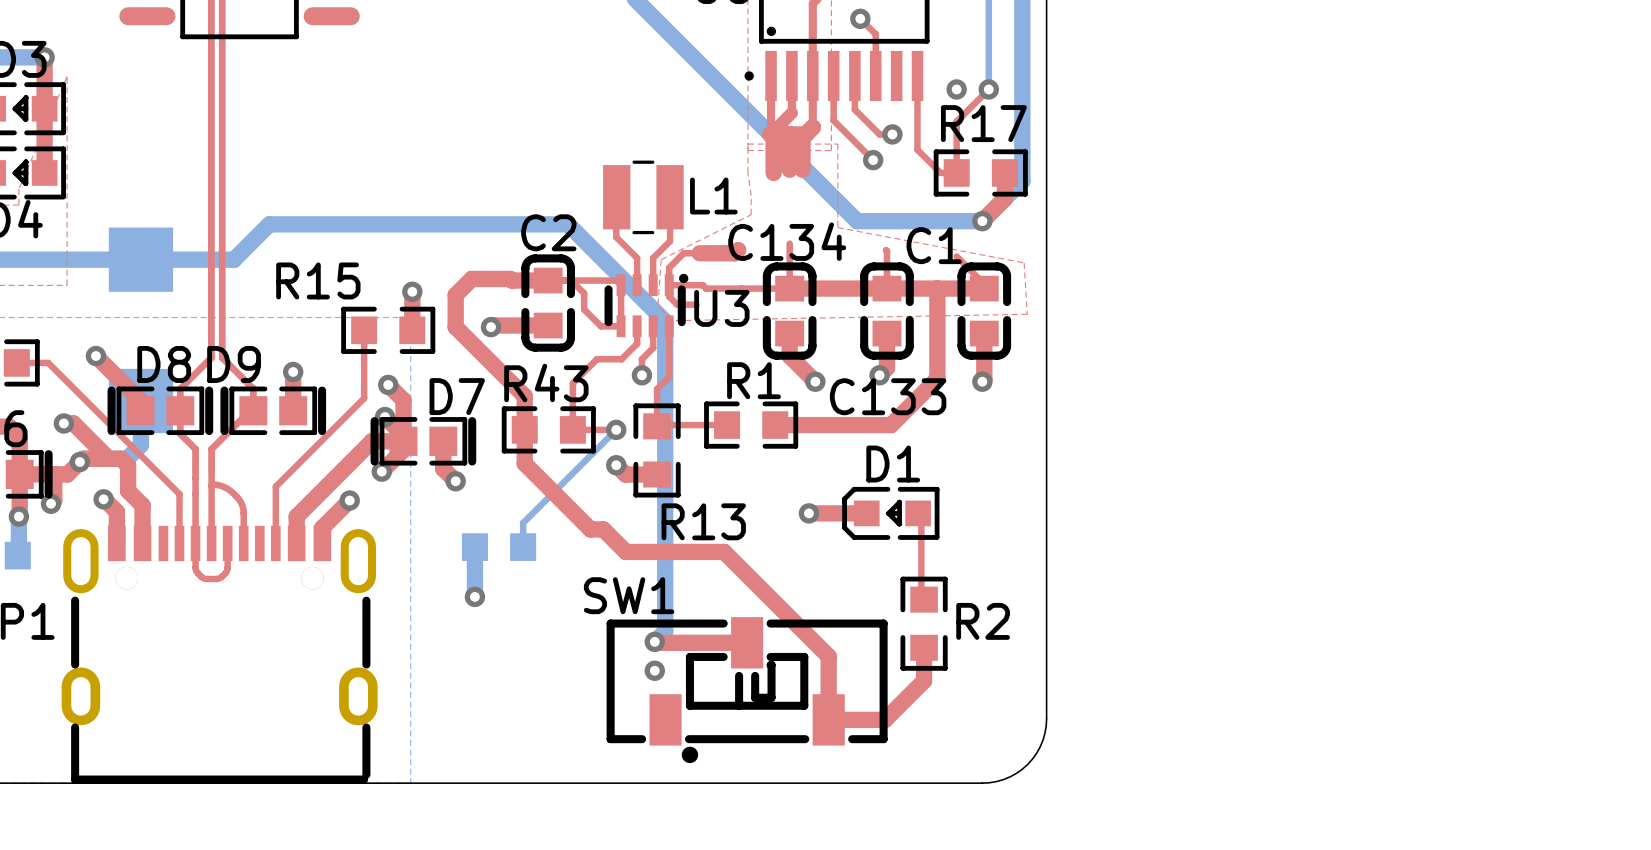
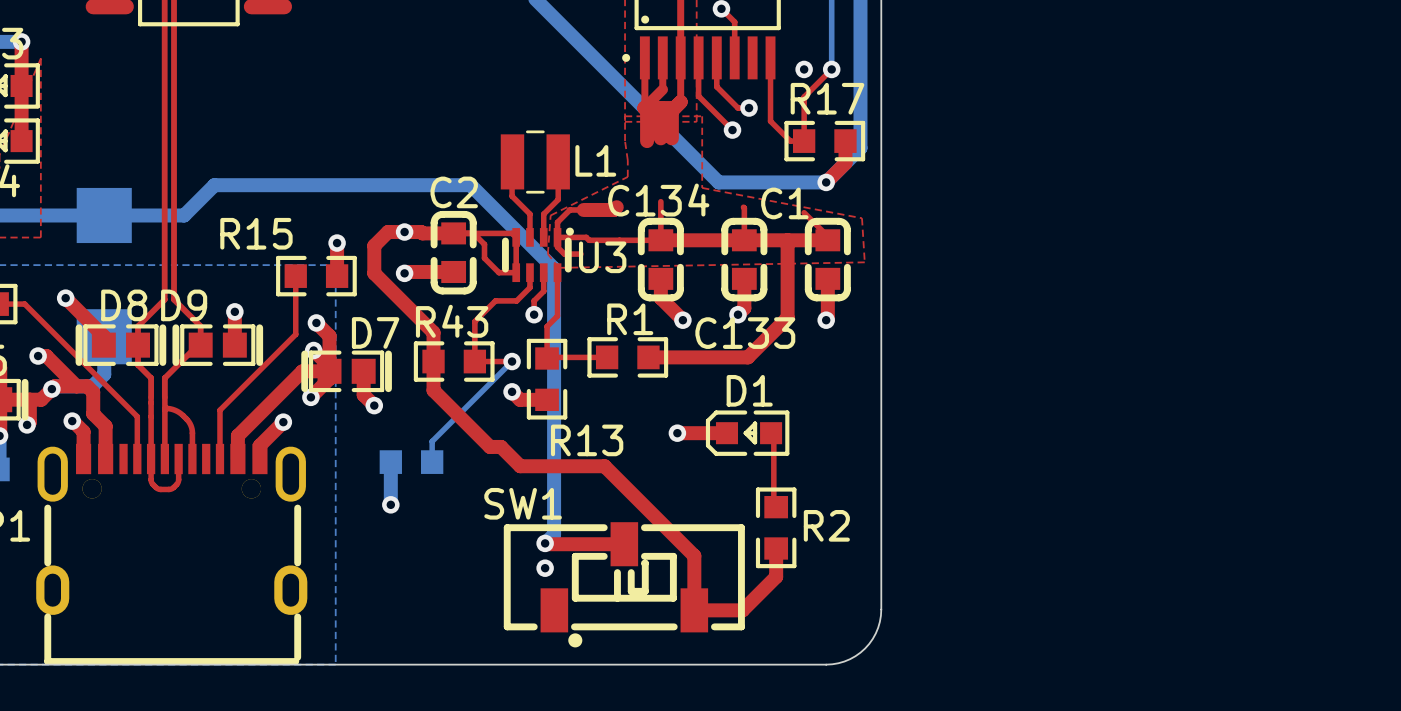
via: none -> (404, 232)

